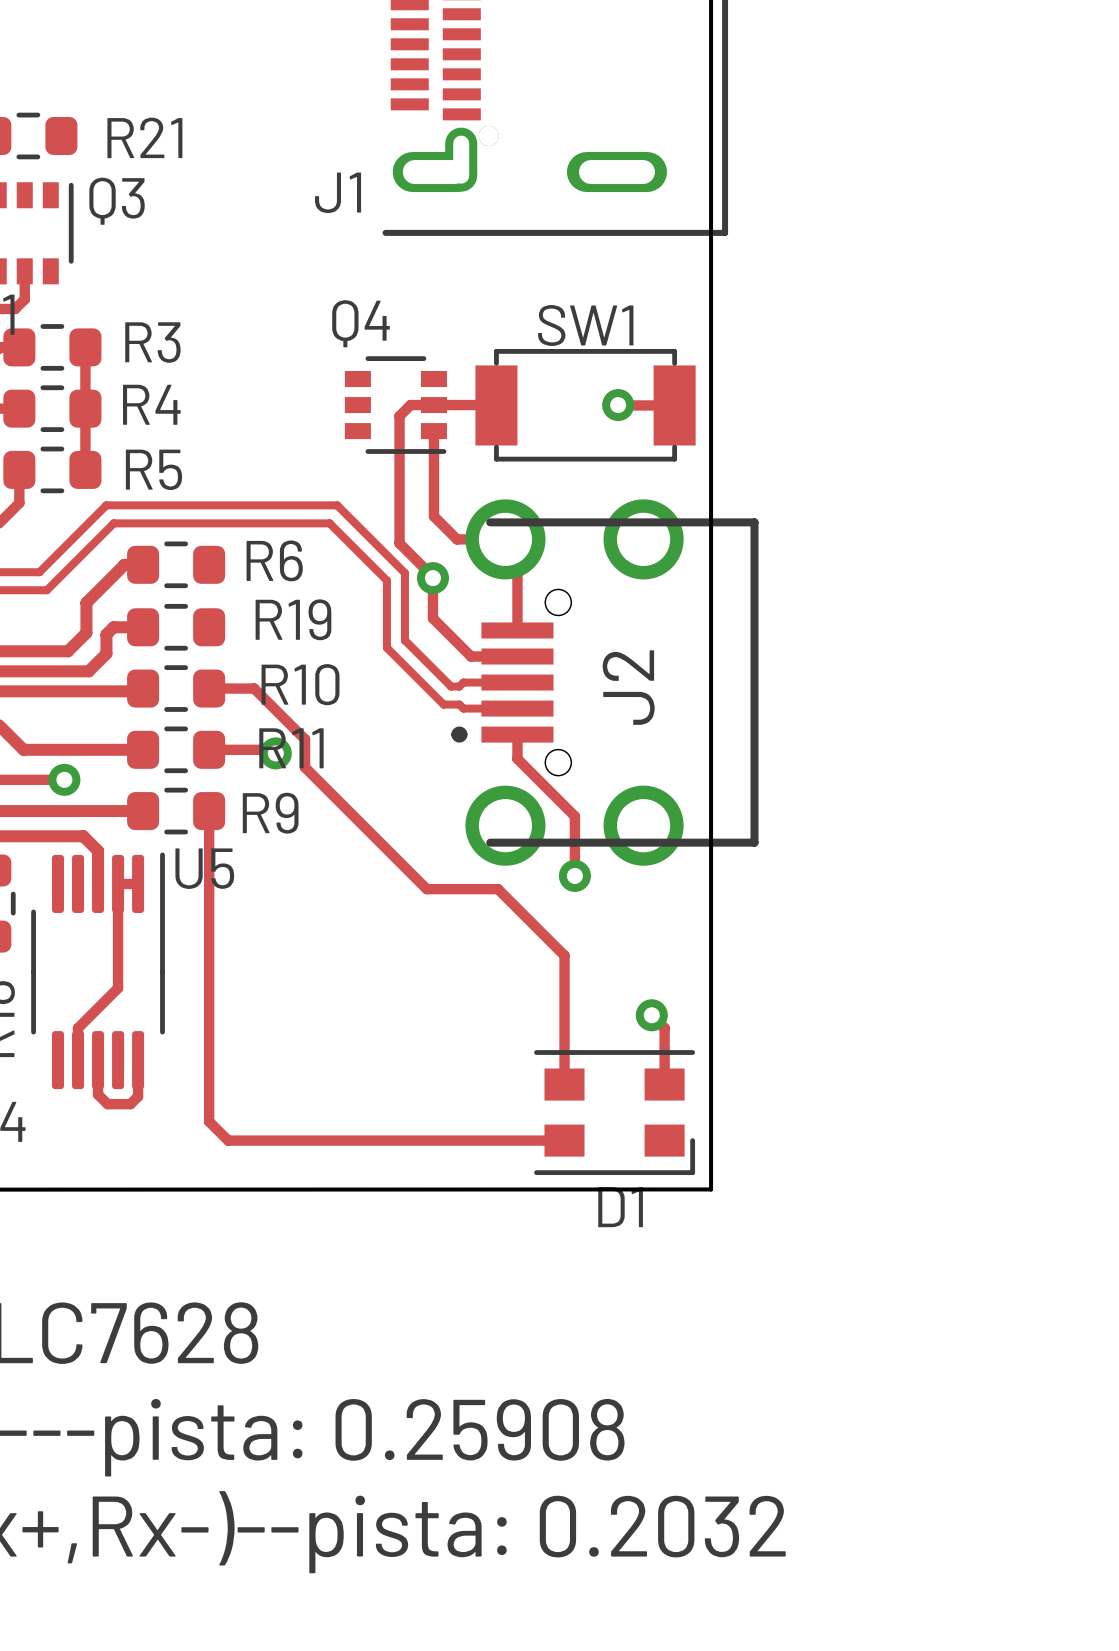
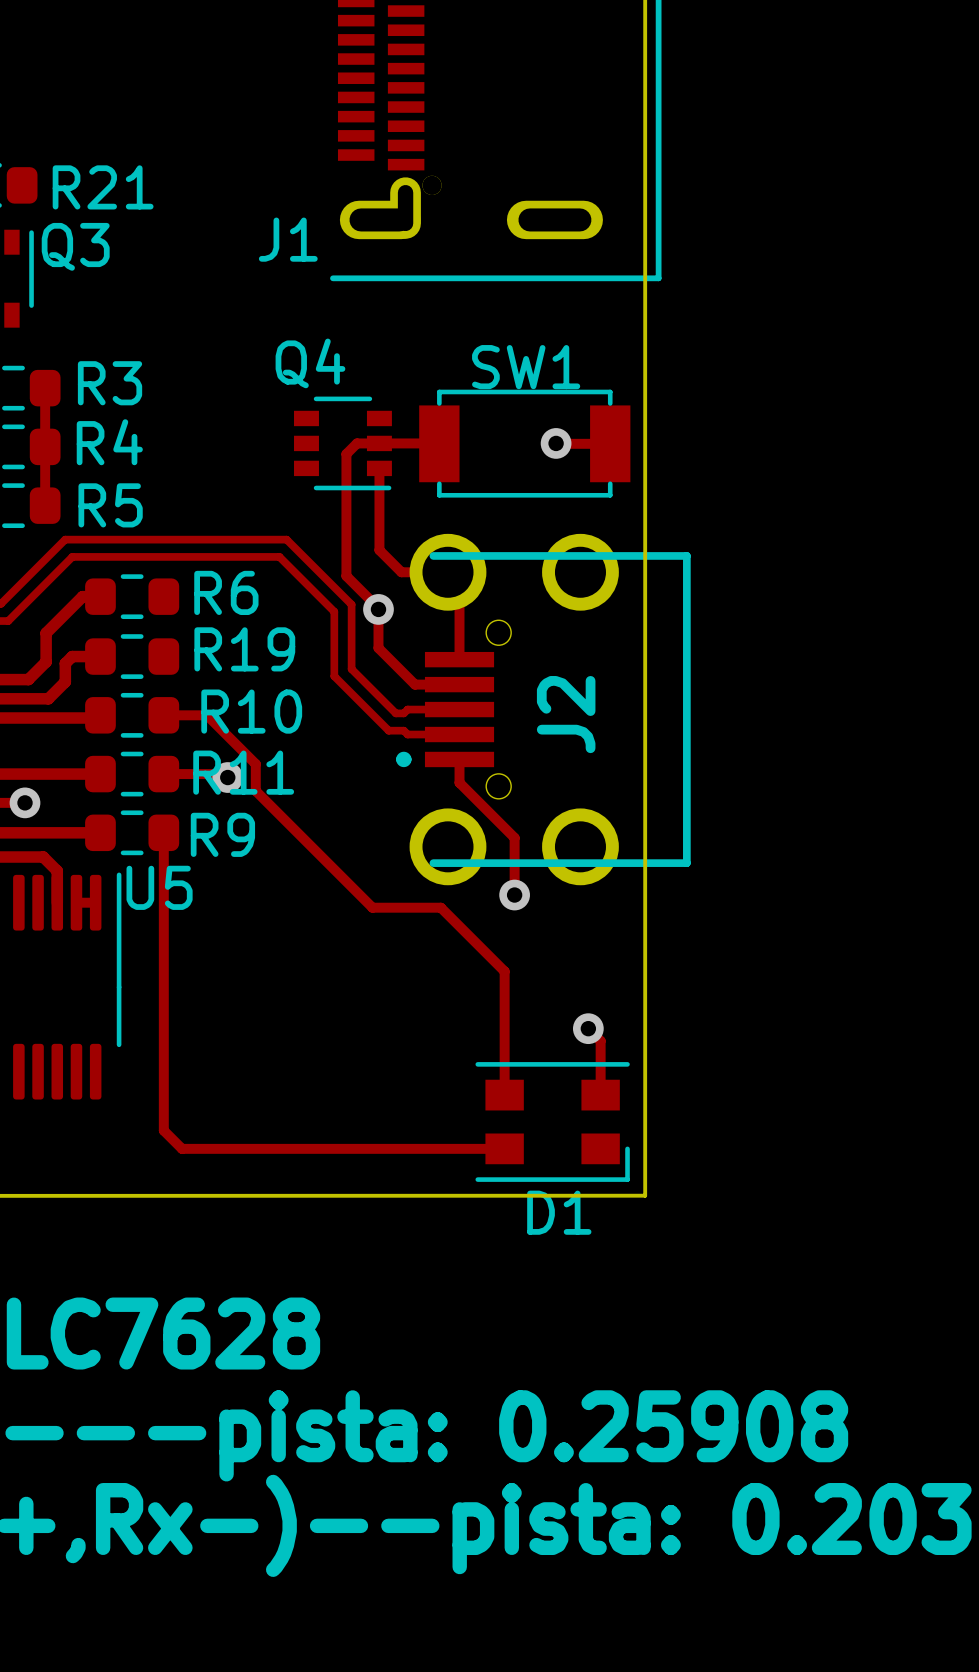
track: (118, 883) (118, 988) (78, 1028) (78, 1060) -> none
track: (98, 1060) (98, 1094) (107, 1104) (130, 1104) (138, 1096) (138, 1060) -> none

